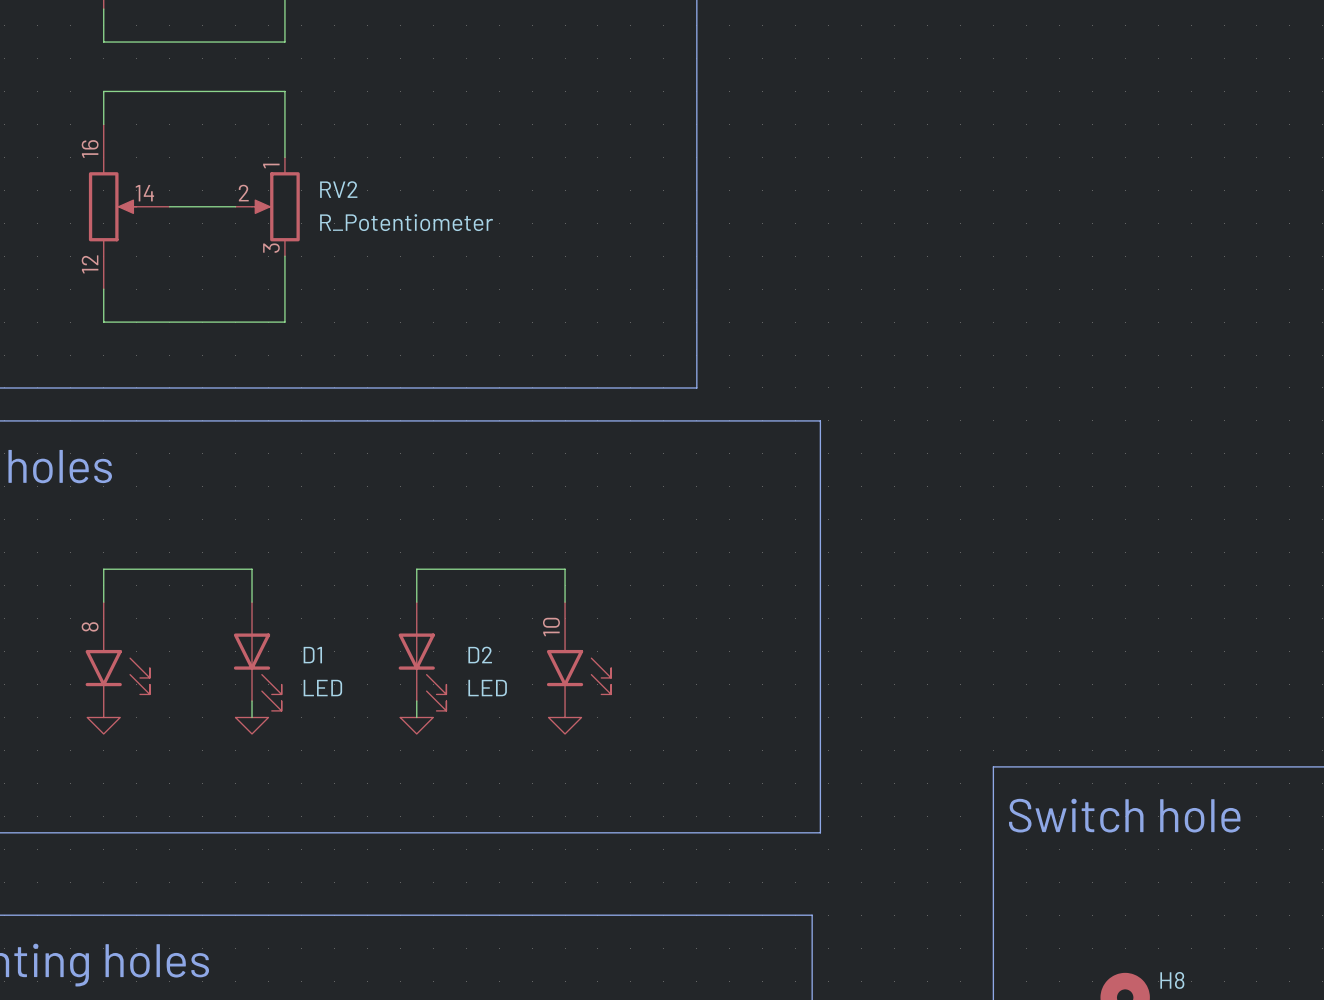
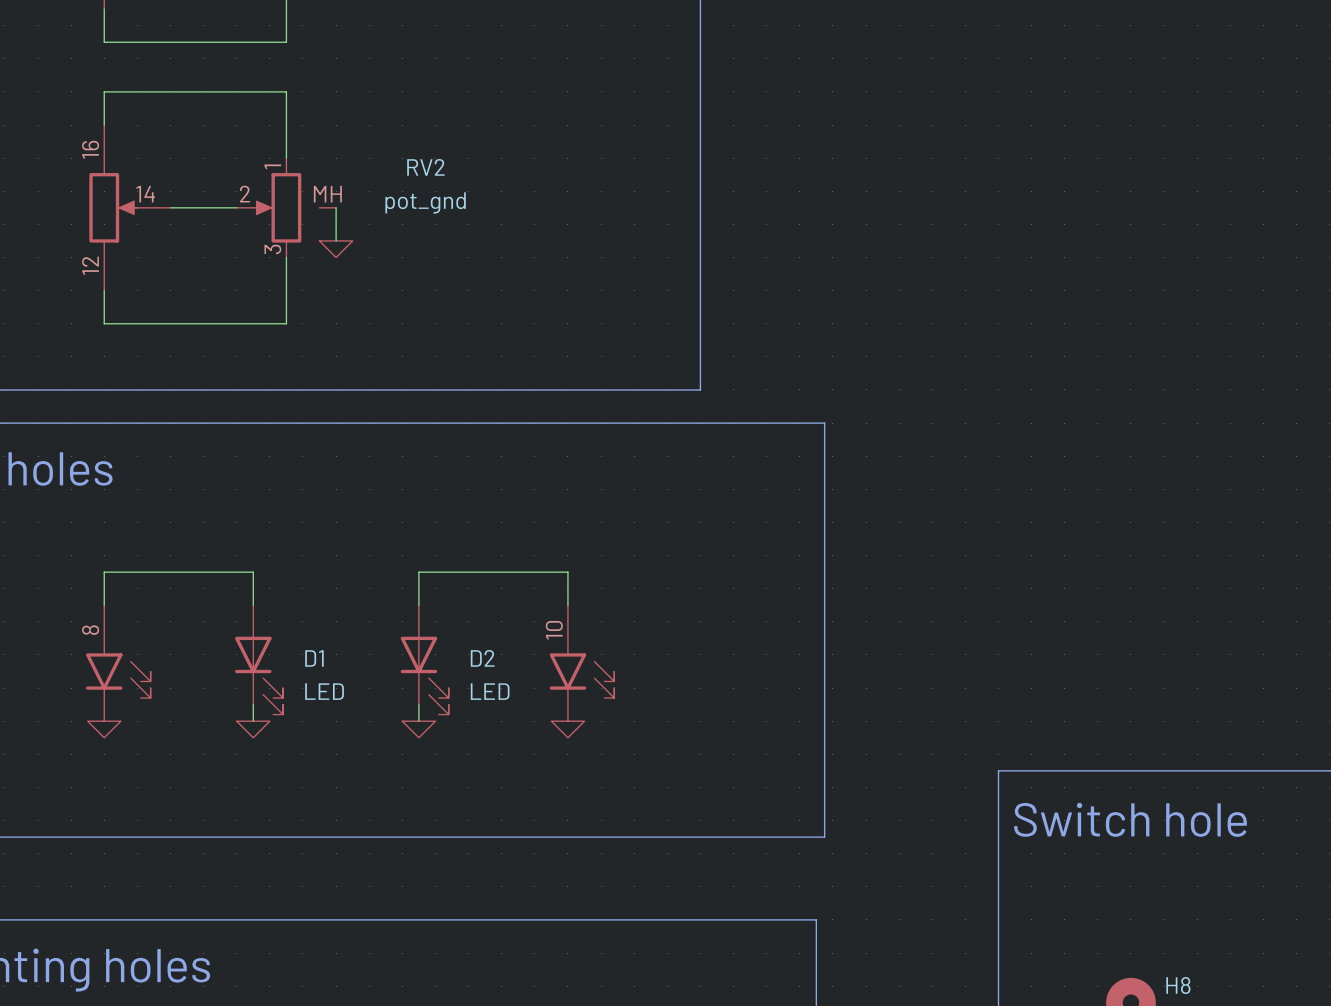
RV2 symbol: [235, 157, 300, 257] -> [236, 158, 337, 258]
RV2 name position: RV2 (338, 189) -> RV2 (425, 167)
wire: none -> (336, 207) (336, 240)
RV2 value: R_Potentiometer (406, 222) -> pot_gnd (425, 202)
power symbol: none -> (336, 249)

